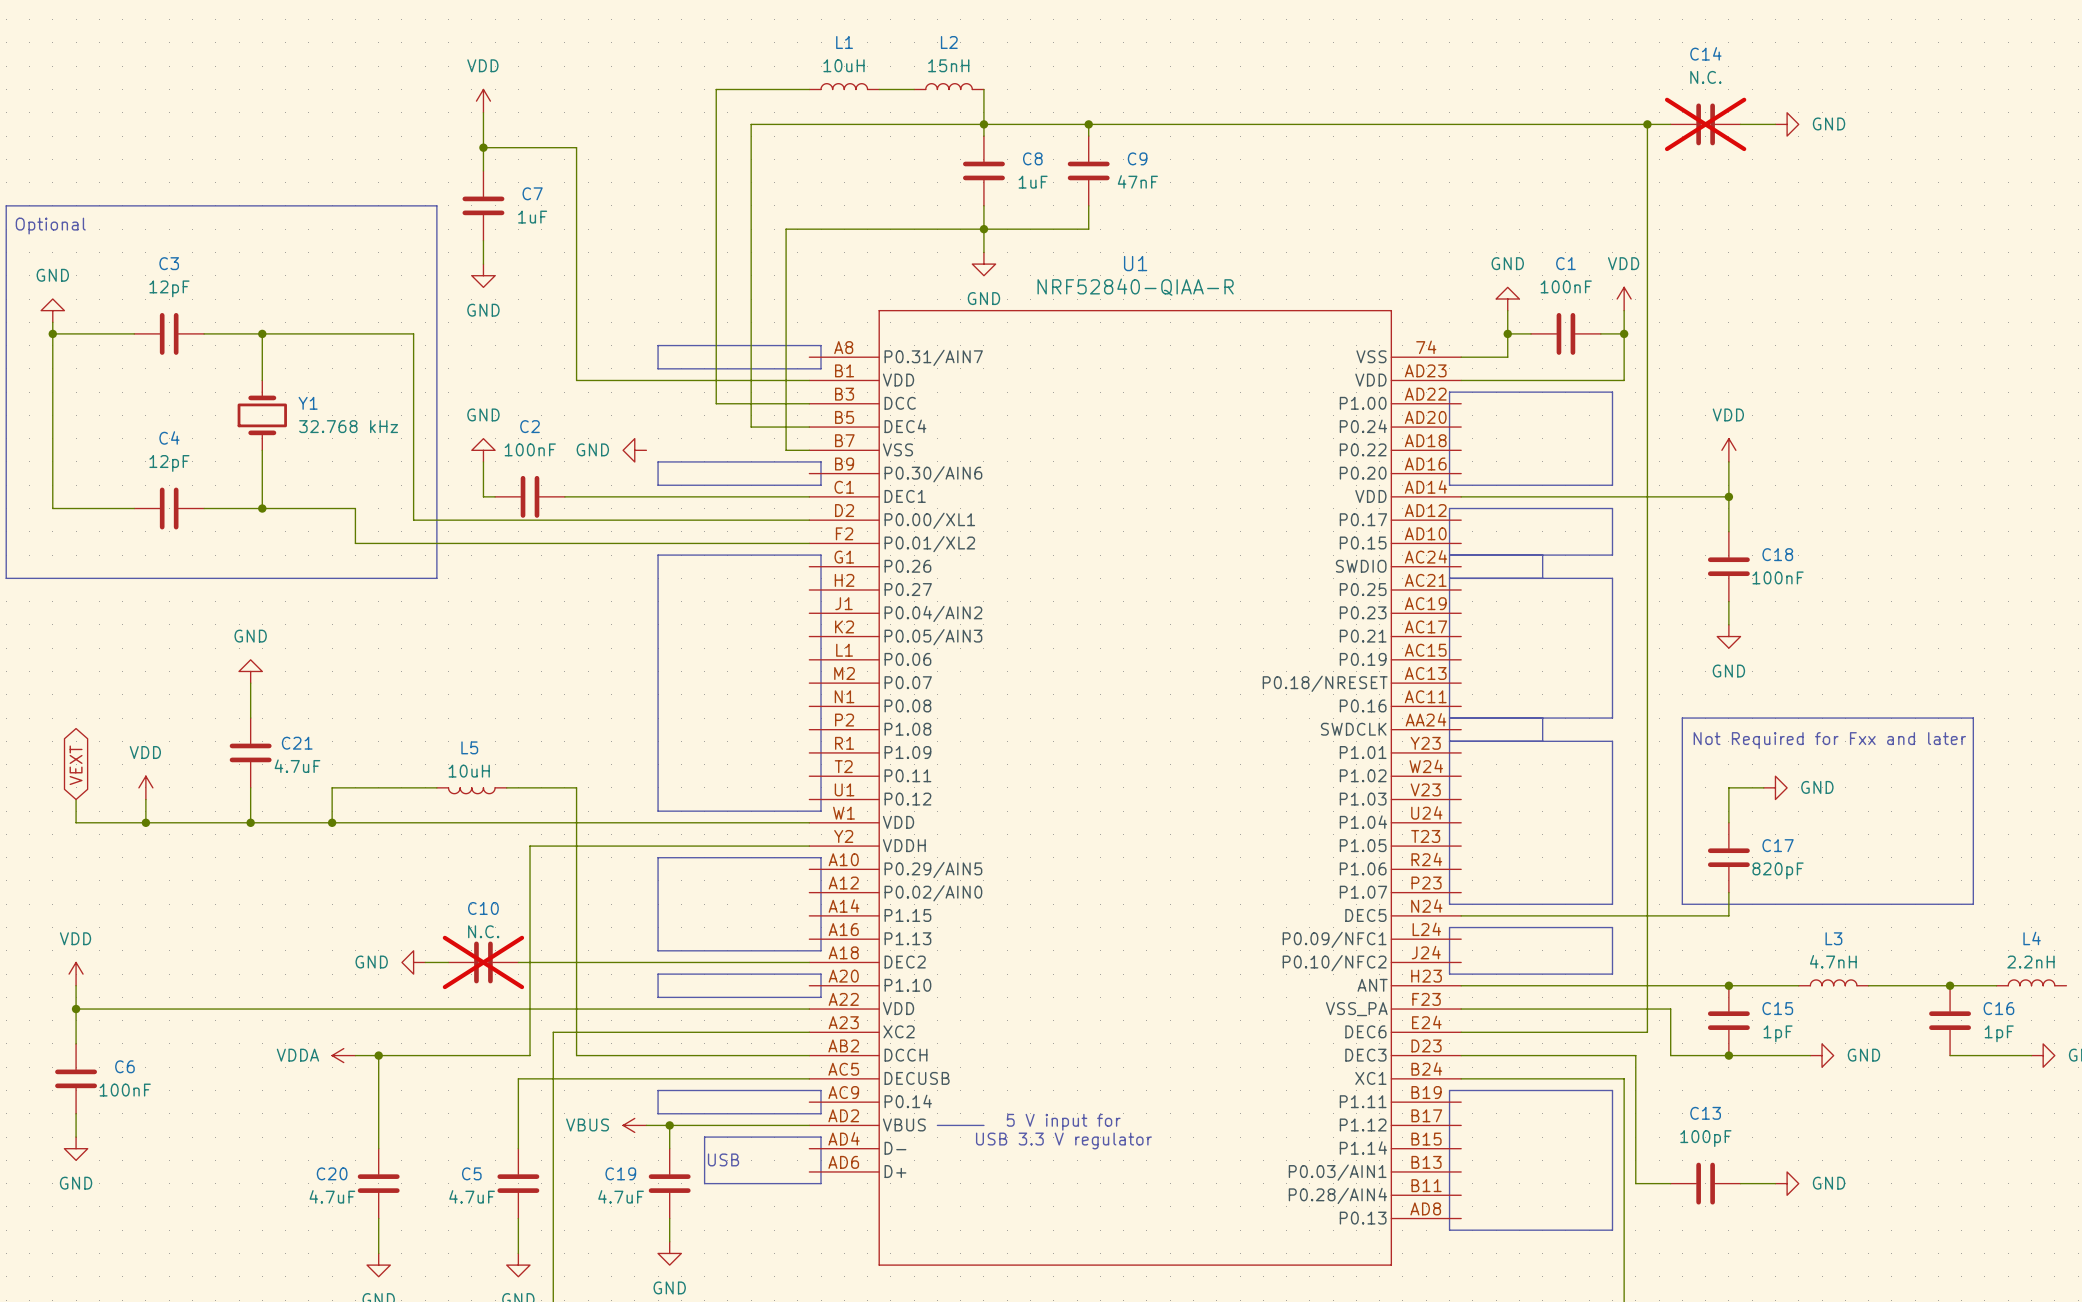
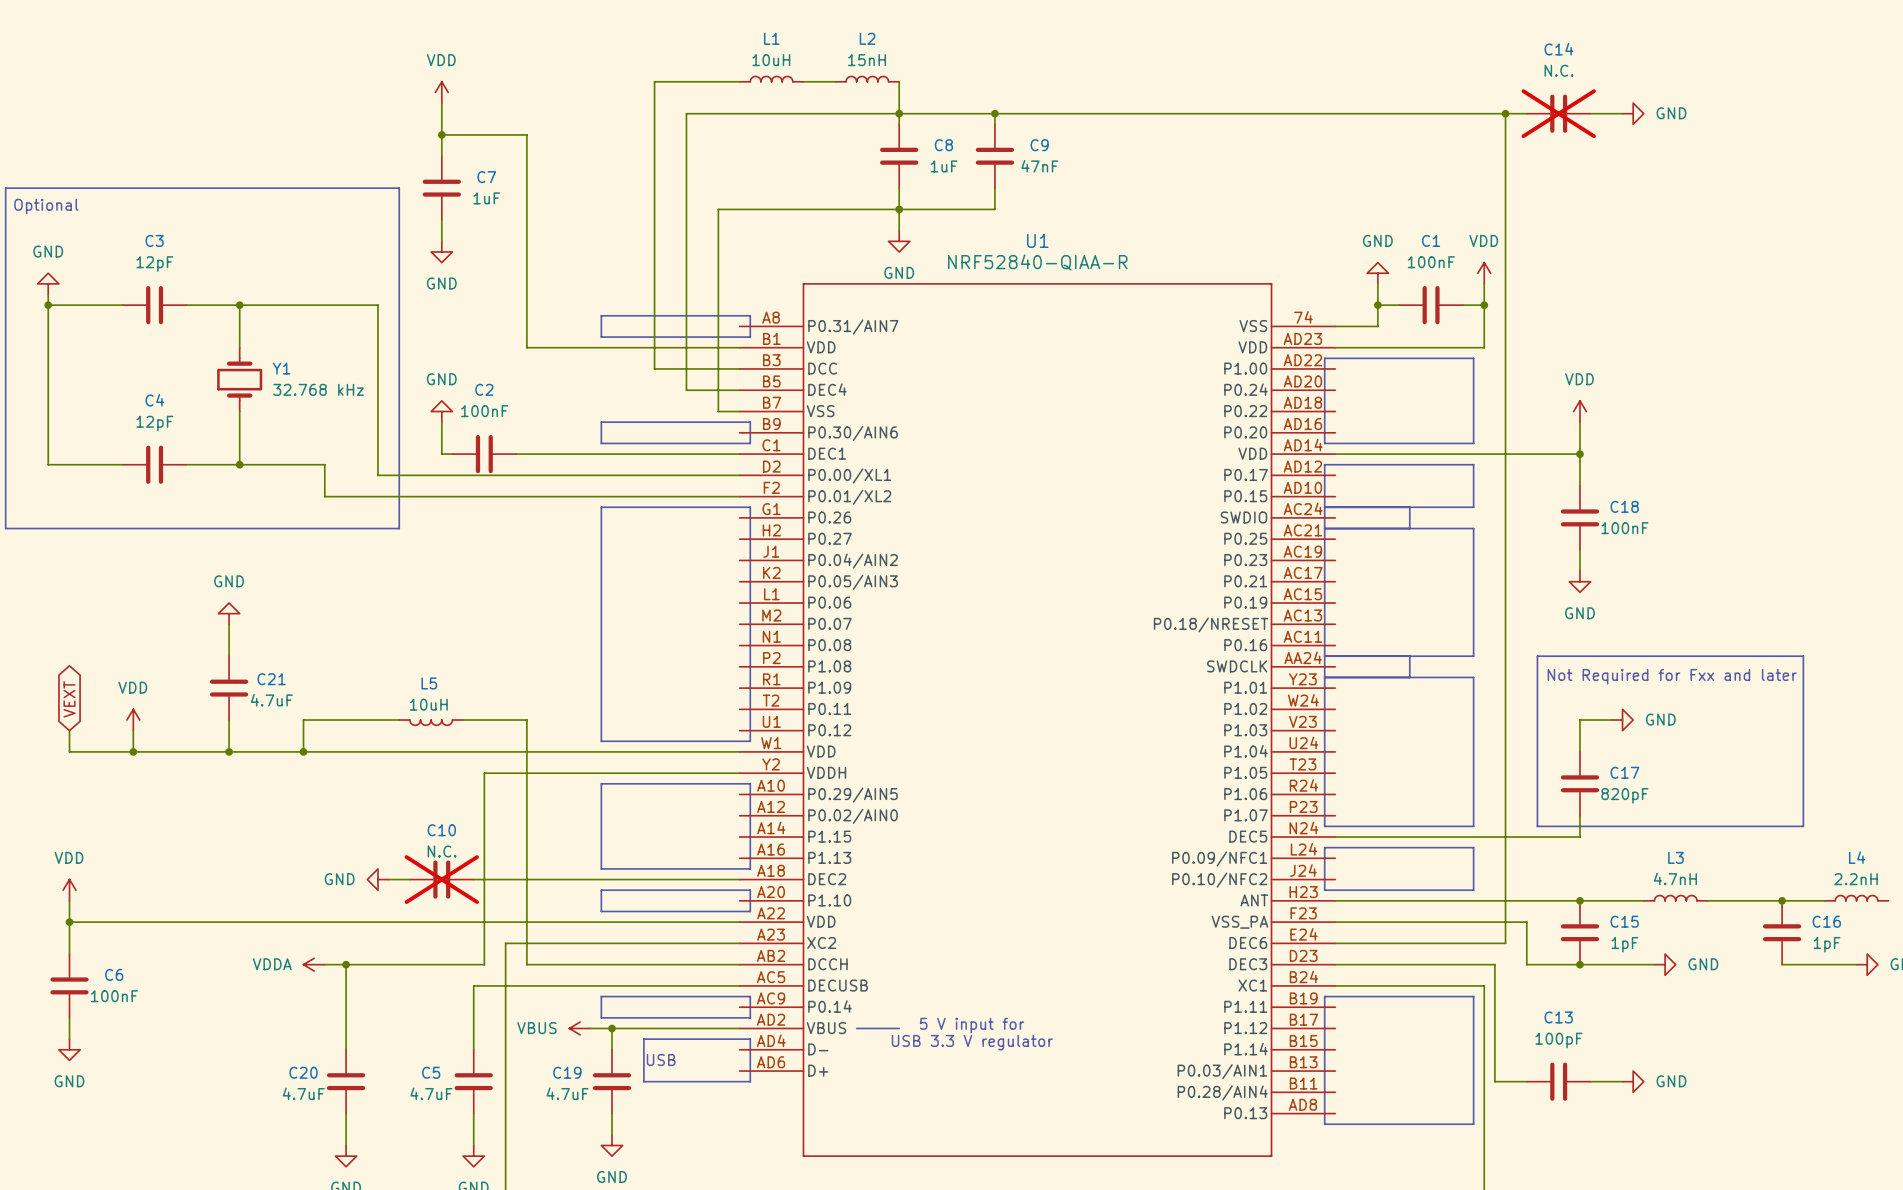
power symbol: GND (634, 450) -> none

